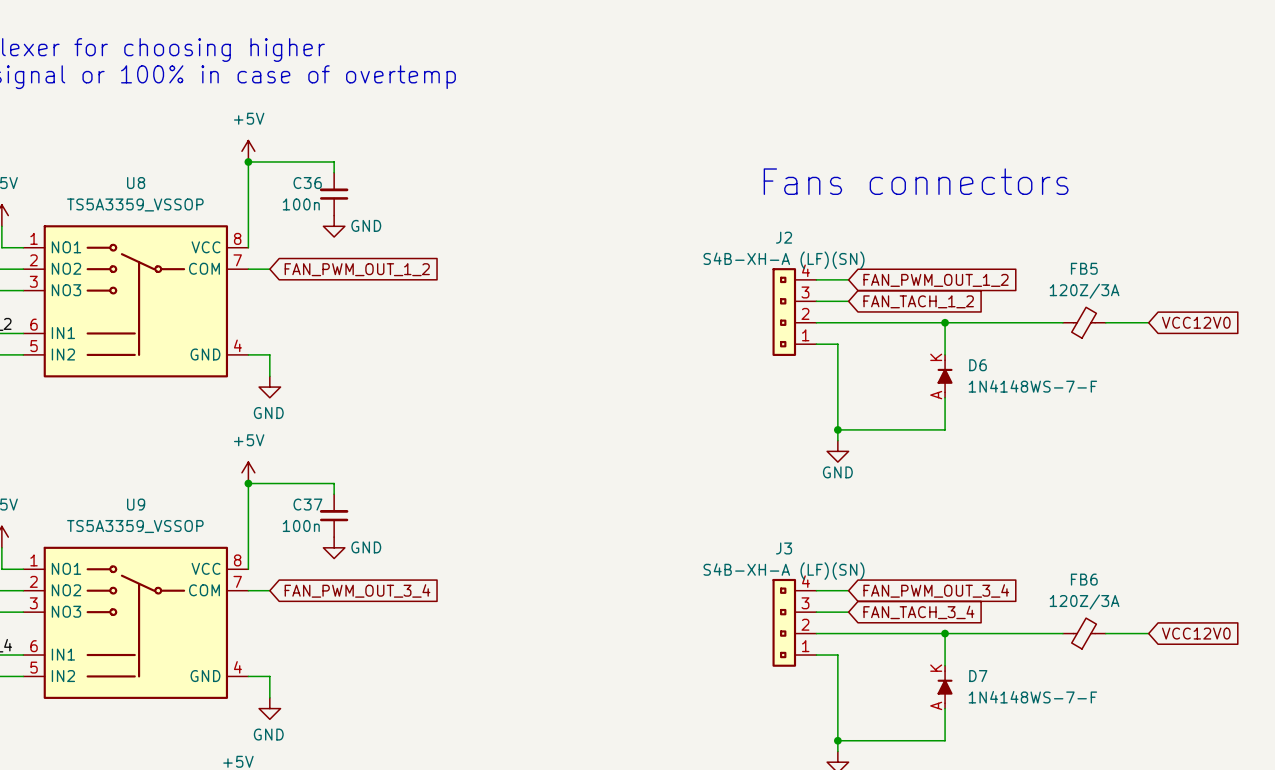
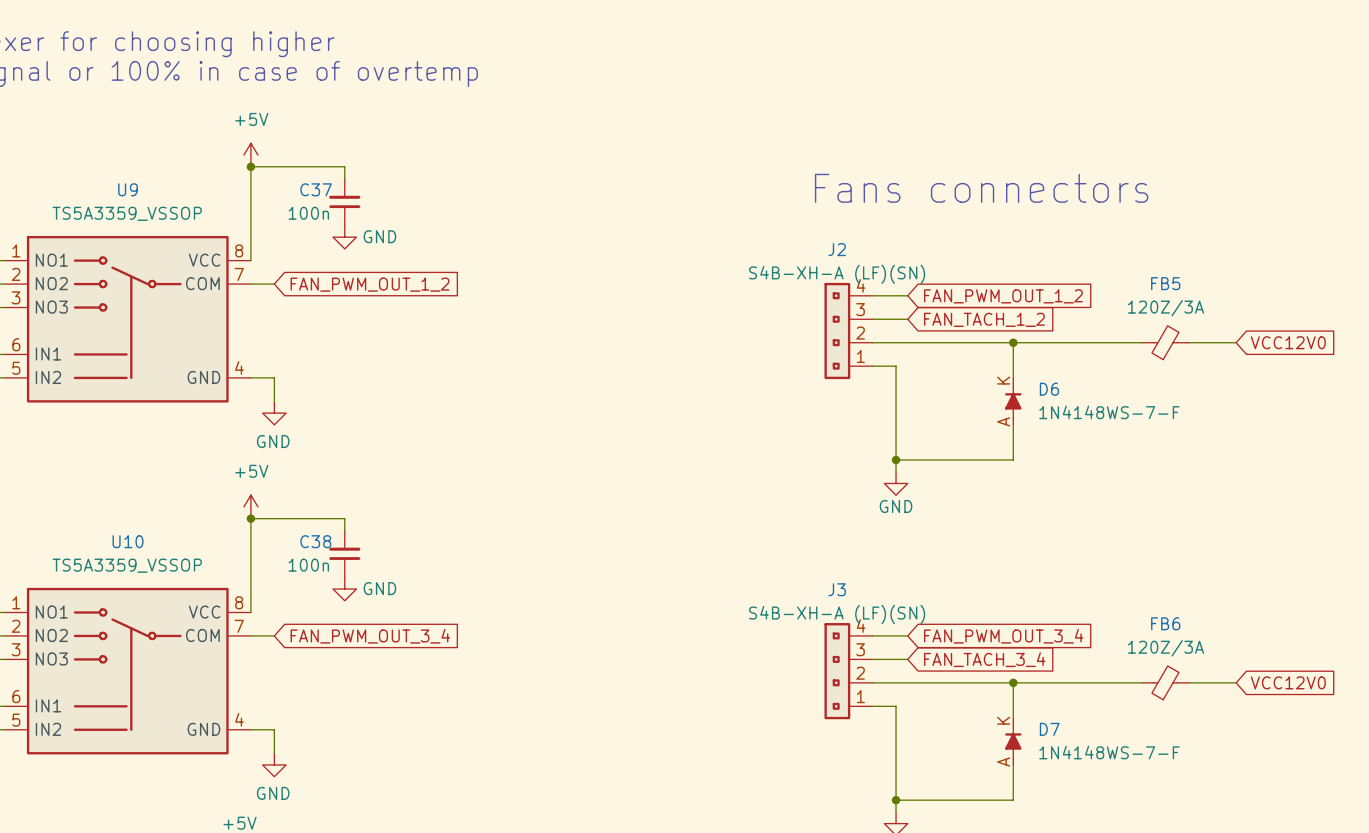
U8 name: U8 (136, 183) -> U9 (128, 189)
C36 name: C36 (307, 183) -> C37 (316, 189)
U9 name: U9 (136, 504) -> U10 (128, 541)
C37 name: C37 (307, 504) -> C38 (315, 541)

